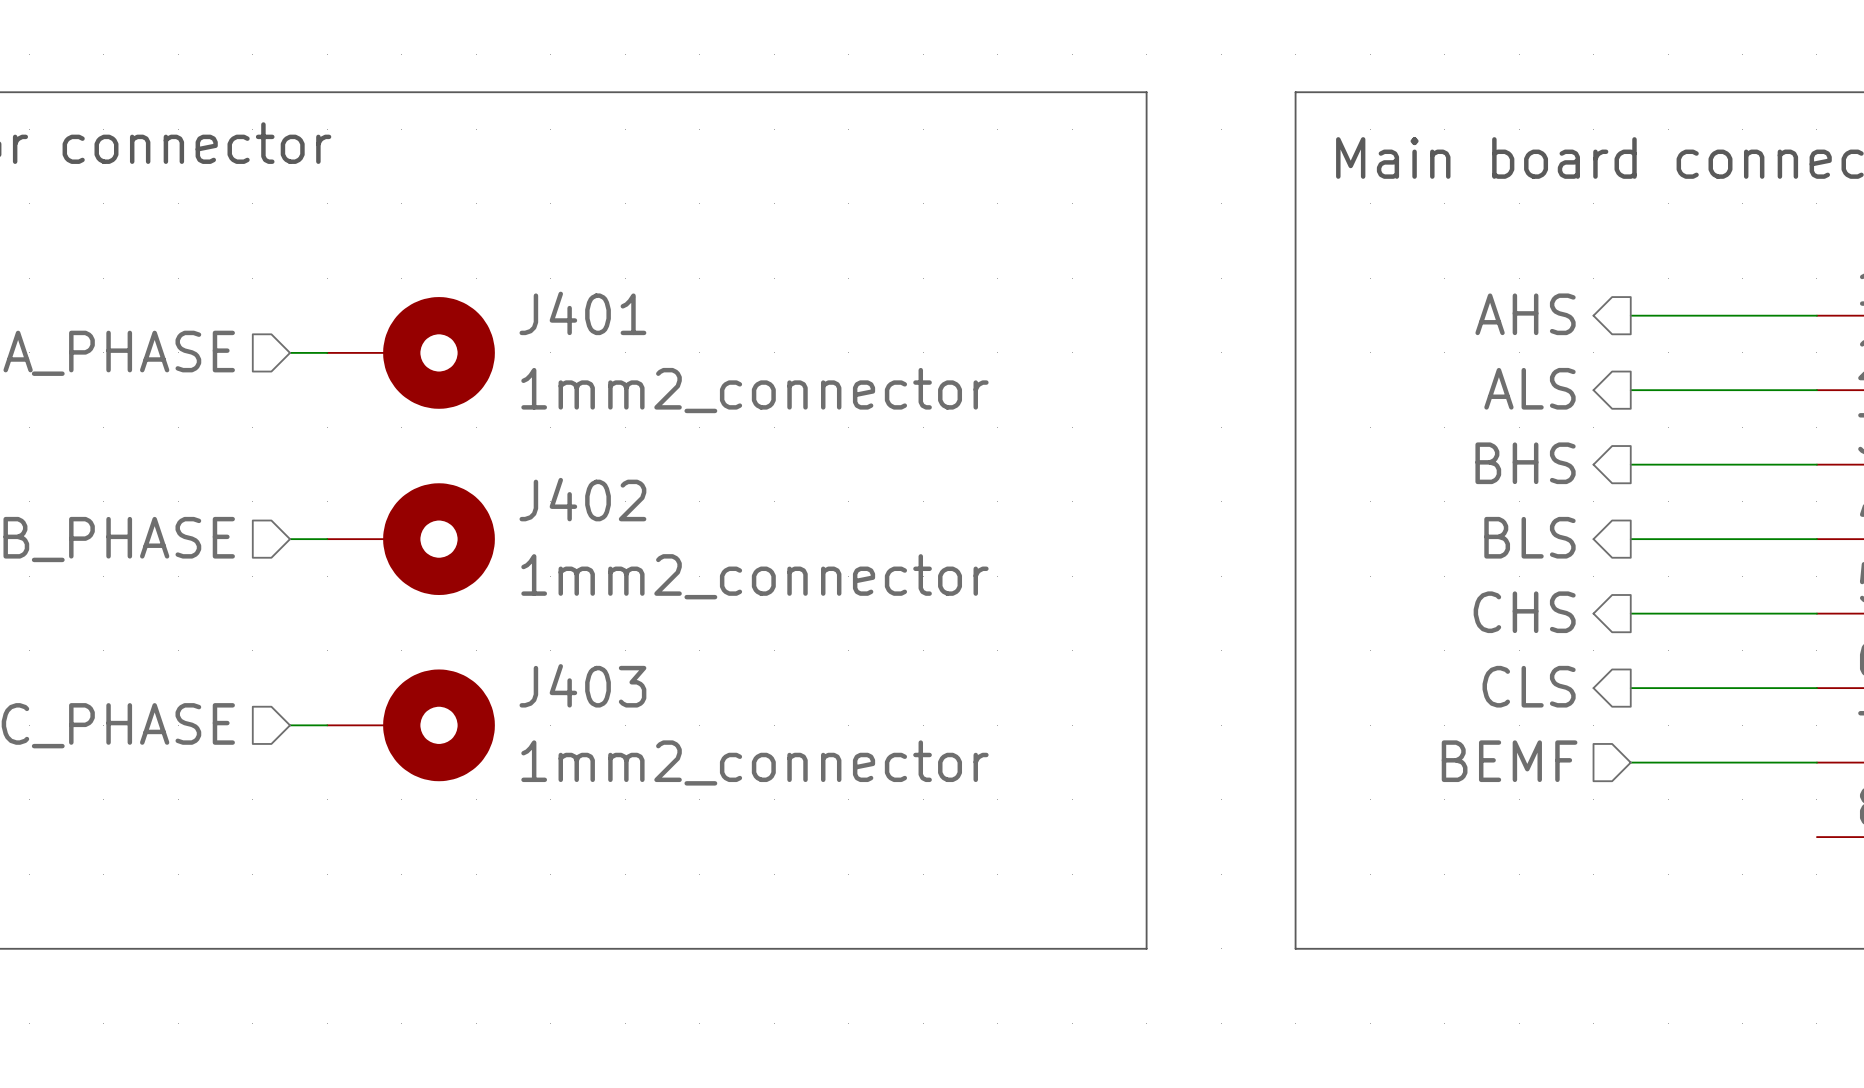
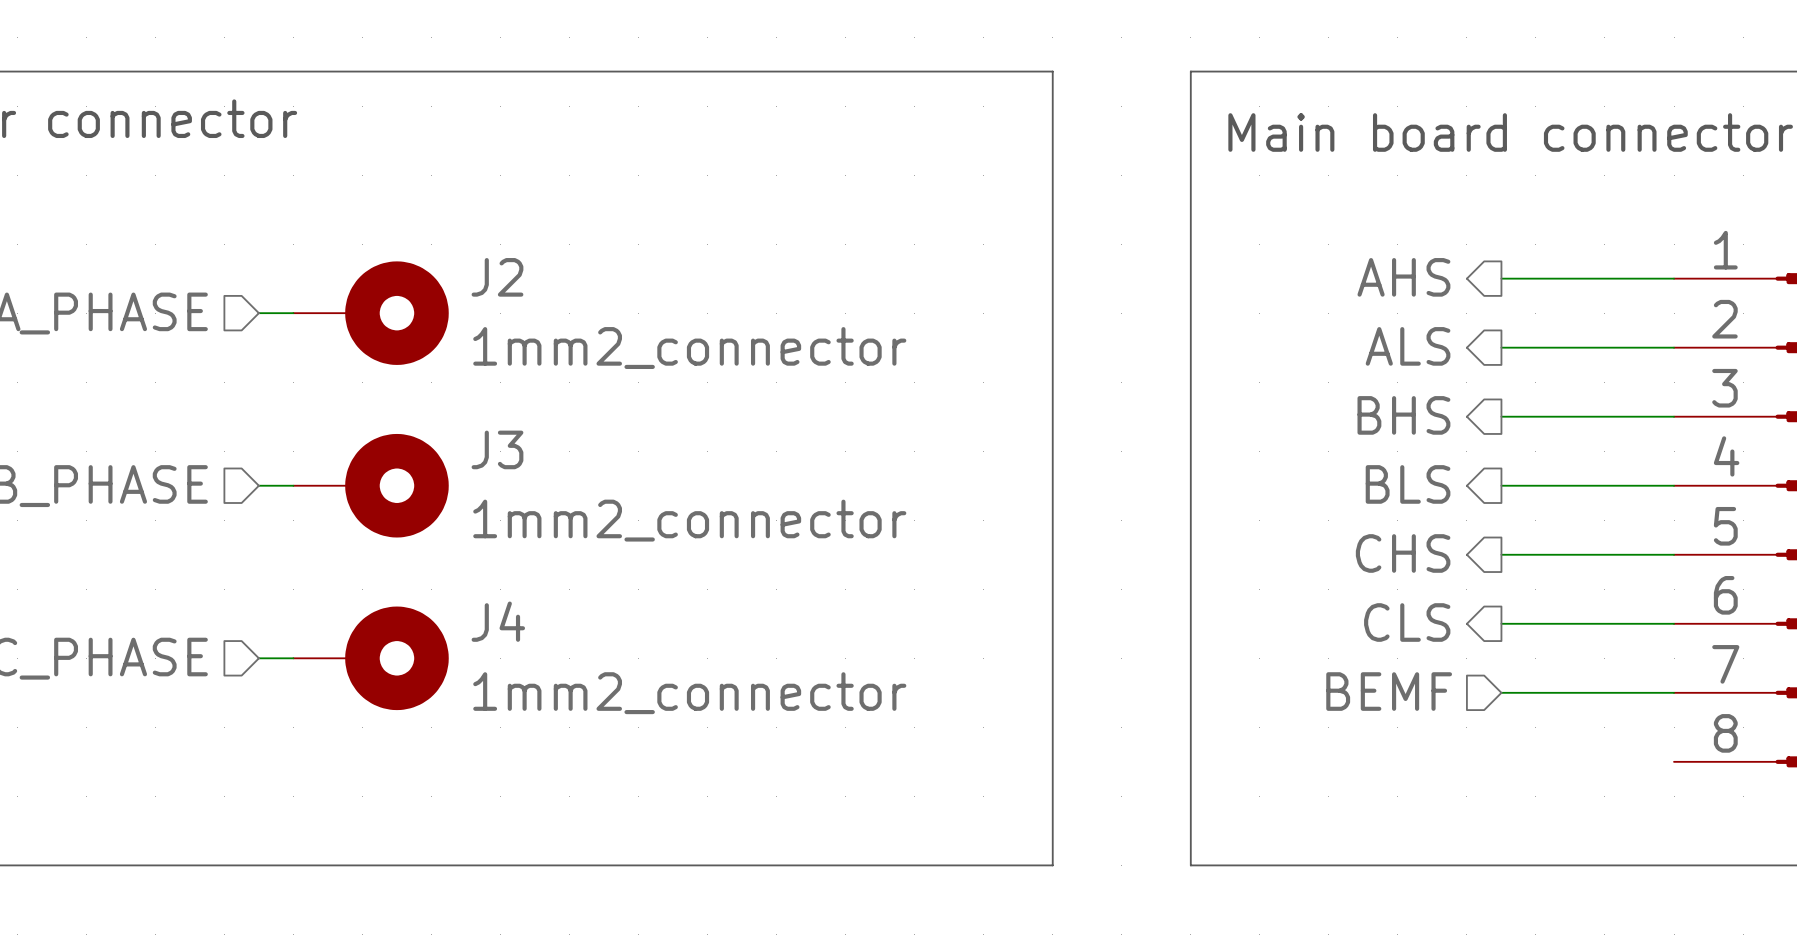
J401 name: J401 (582, 313) -> J2 (497, 277)
J402 name: J402 (582, 499) -> J3 (497, 449)
J403 name: J403 (582, 685) -> J4 (498, 621)

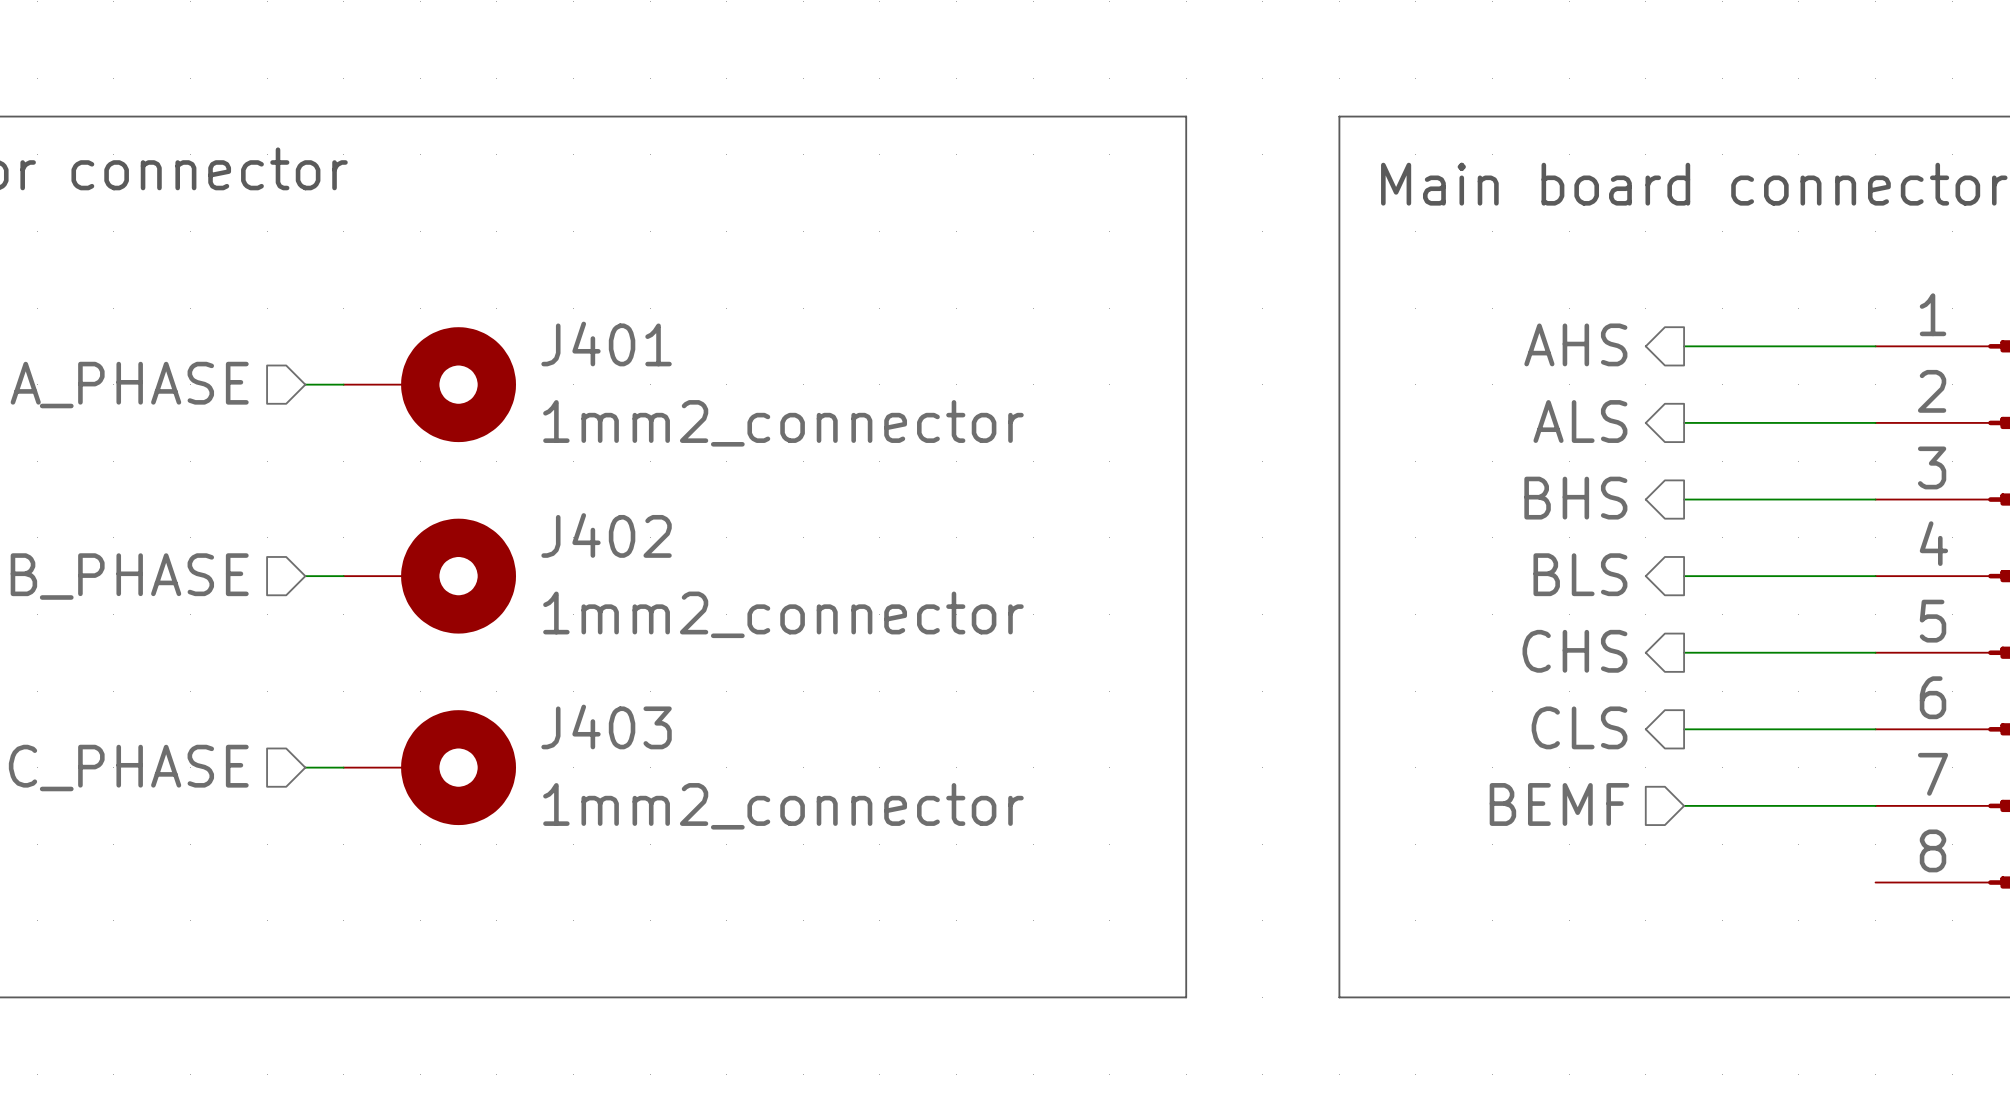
J2 name: J2 (497, 277) -> J401 (606, 344)
J3 name: J3 (497, 449) -> J402 (606, 535)
J4 name: J4 (498, 621) -> J403 (606, 726)

